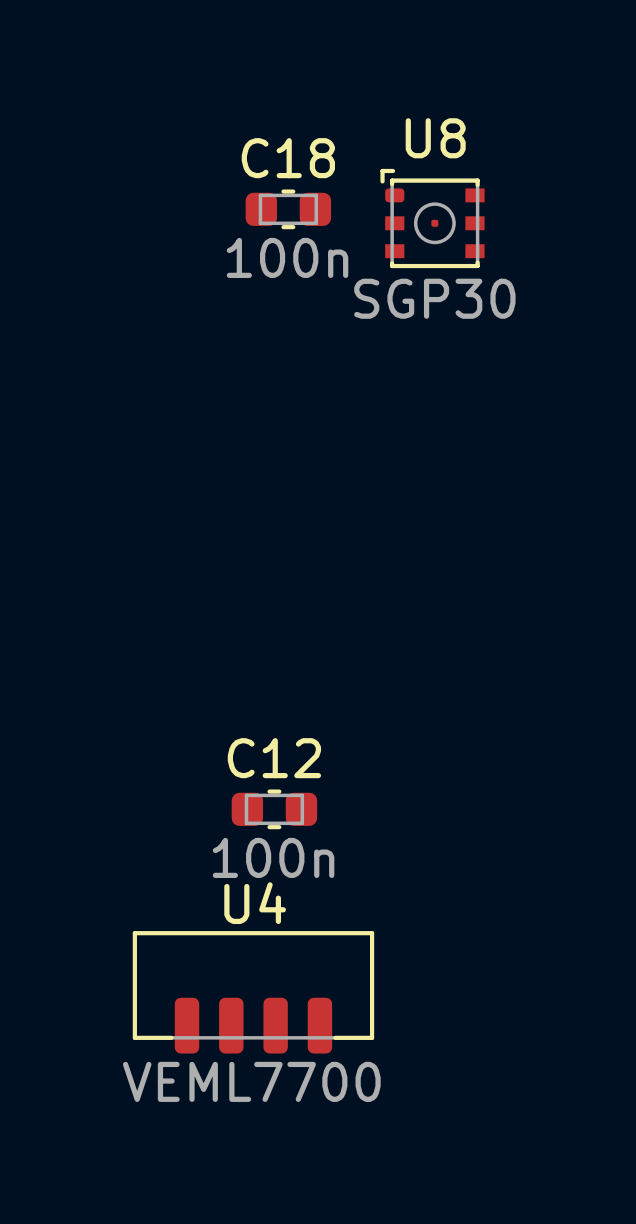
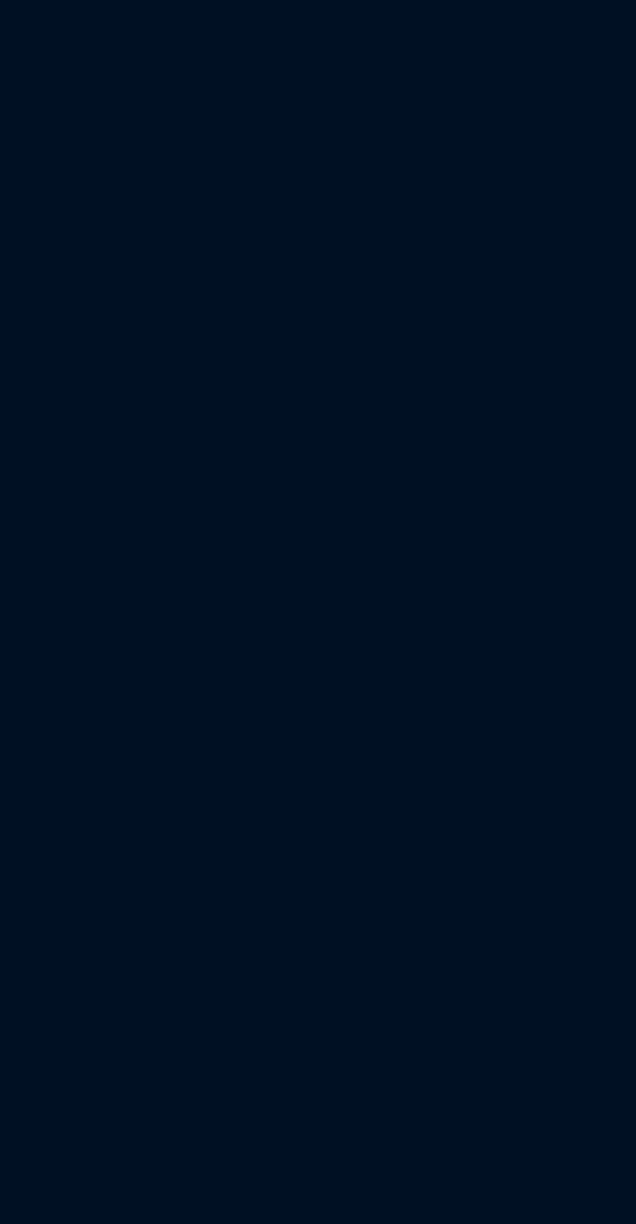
C18: 100n (288, 209) -> none
U8: SGP30 (432, 218) -> none
C12: 100n (274, 809) -> none
U4: VEML7700 (253, 992) -> none

